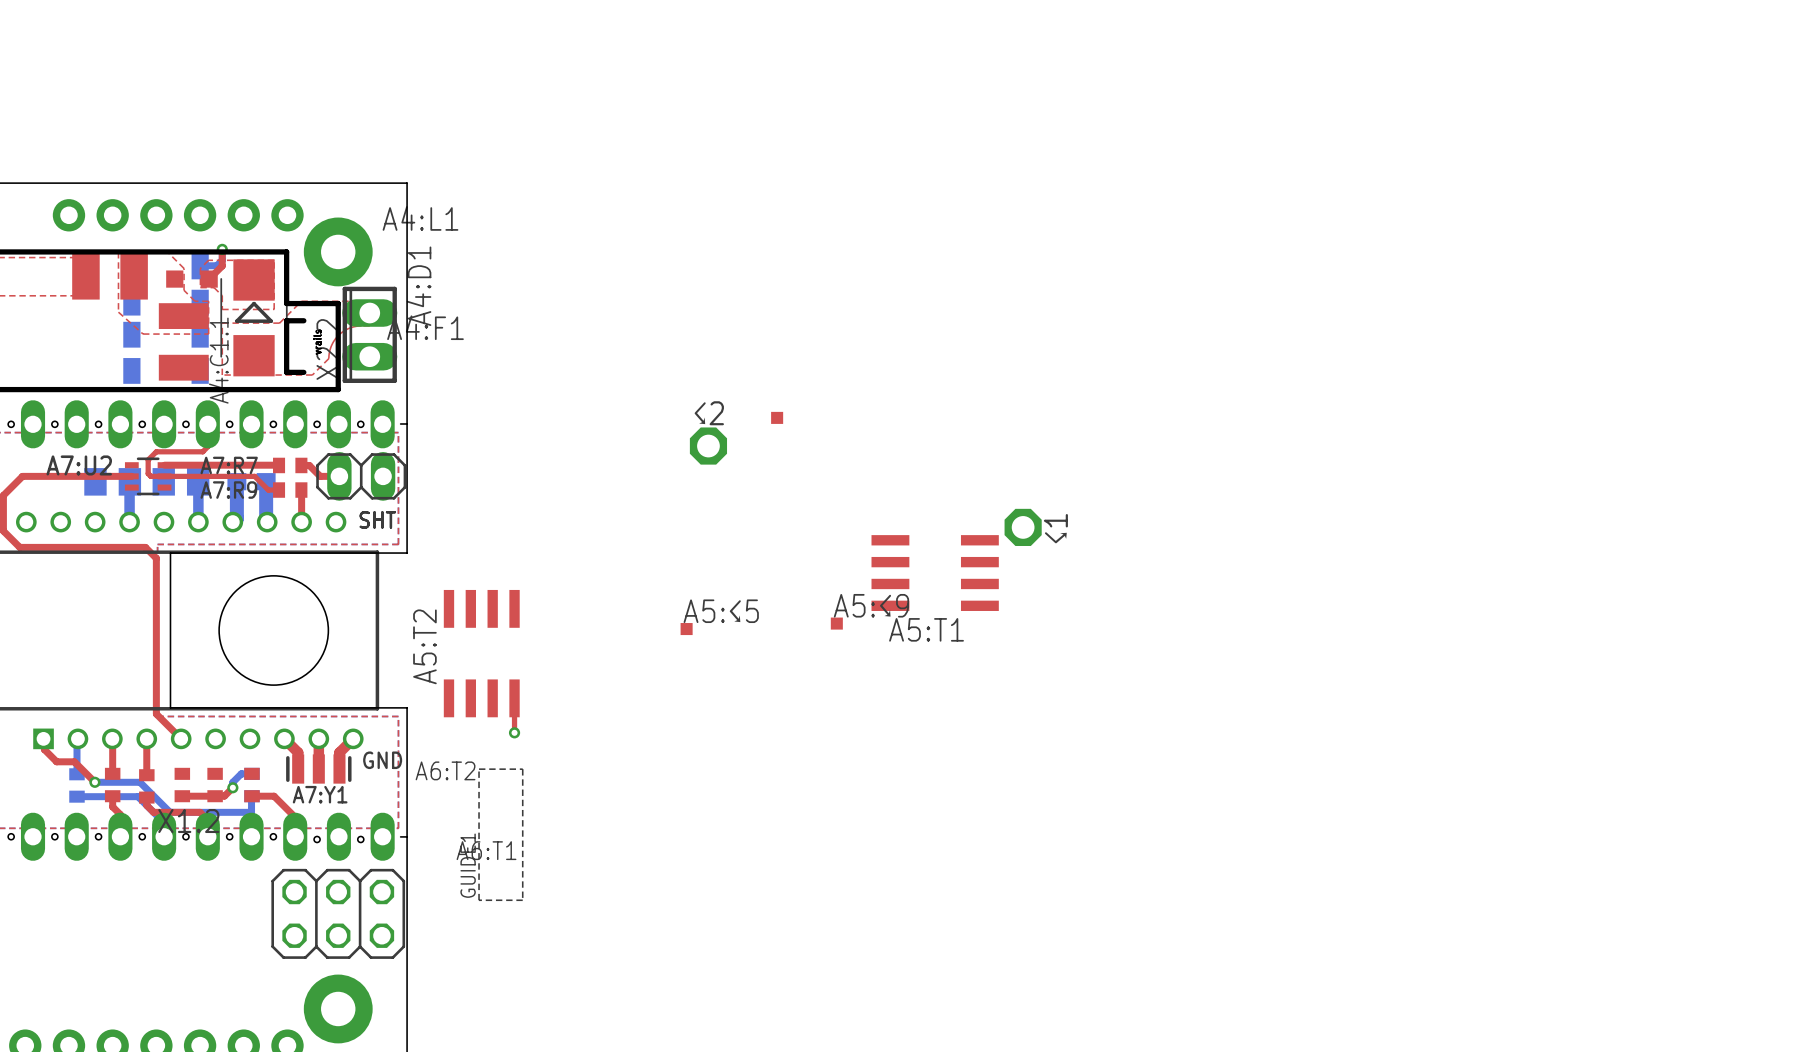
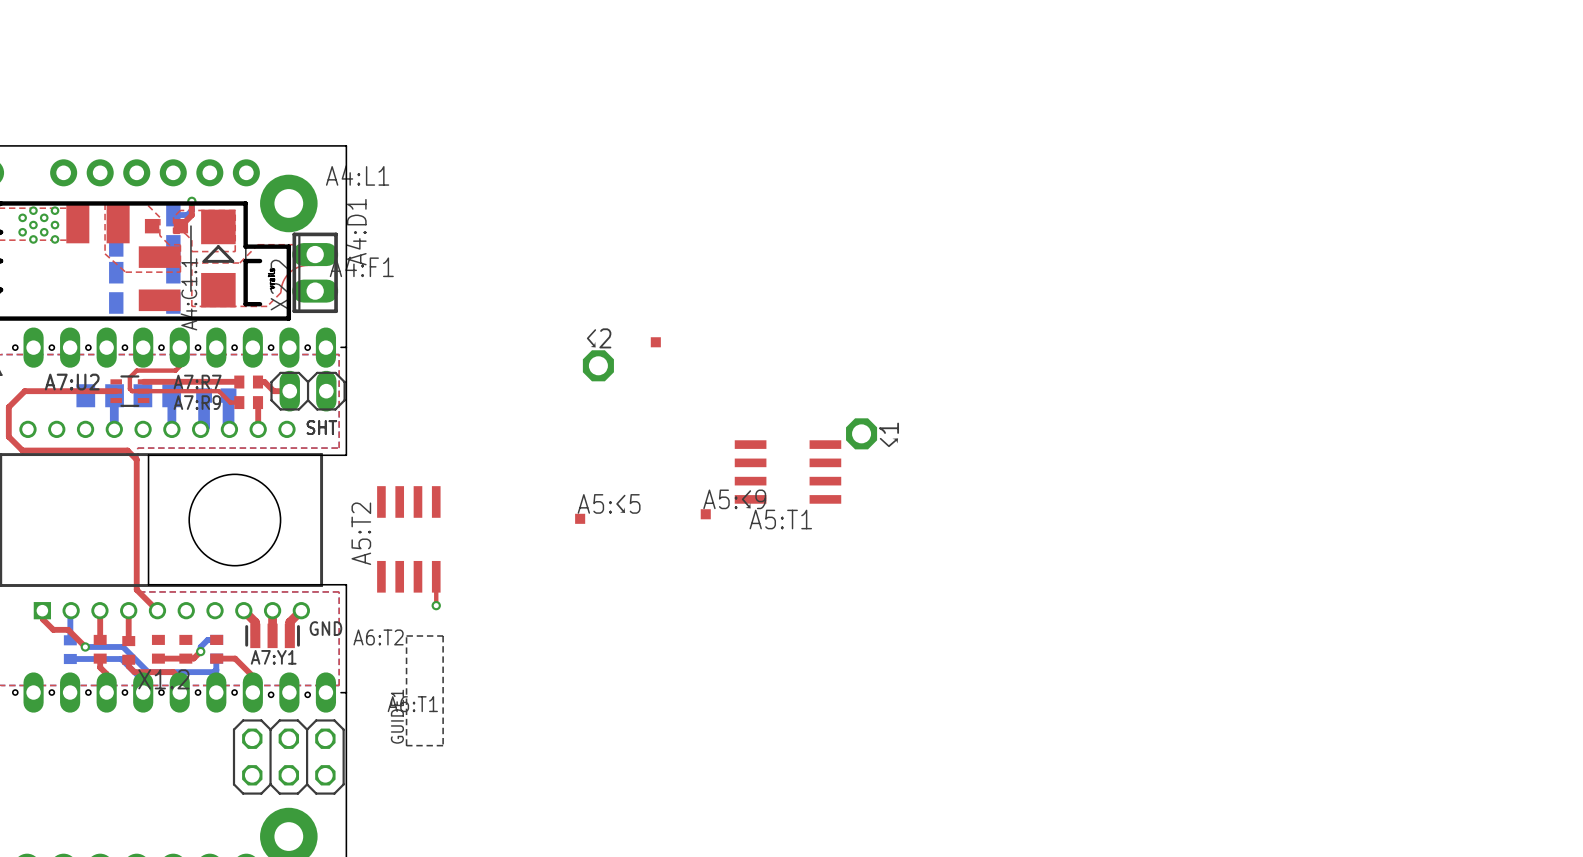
via: none -> (33, 210)
via: none -> (55, 210)
via: none -> (22, 217)
via: none -> (44, 217)
via: none -> (33, 225)
via: none -> (55, 225)
via: none -> (22, 232)
via: none -> (44, 232)
via: none -> (33, 239)
via: none -> (55, 239)

